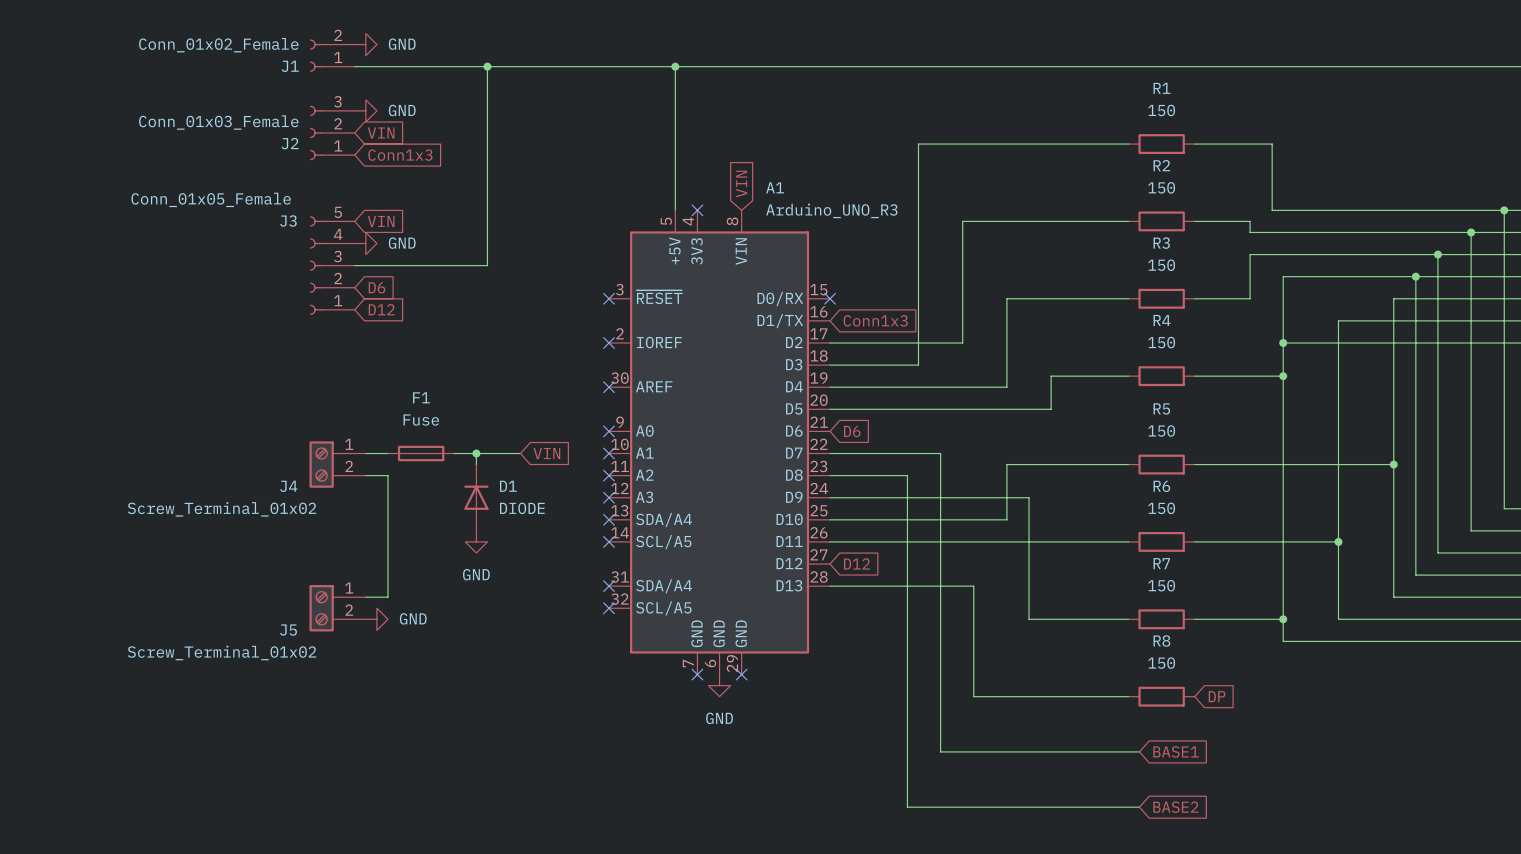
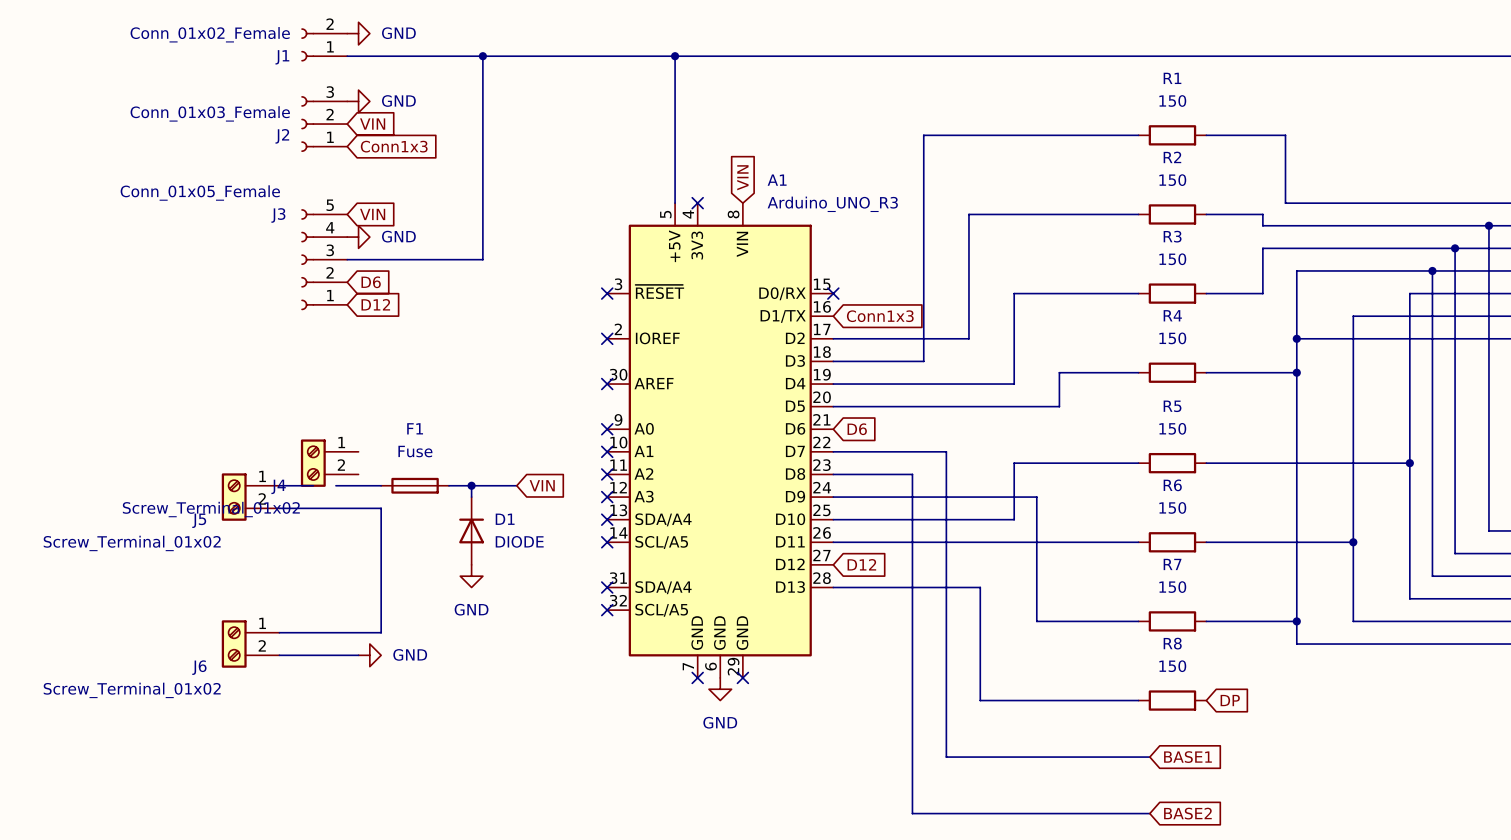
wire: (365, 453) (387, 453) -> none
F1 position: (421, 453) -> (415, 485)
wire: (454, 453) (520, 453) -> (448, 485) (516, 485)
junction position: (476, 453) -> (471, 485)
global label position: VIN (546, 453) -> VIN (542, 485)
wire: (365, 475) (387, 475) (387, 508) -> (279, 508) (381, 508)
wire: none -> (279, 485) (313, 485)
wire: none -> (335, 485) (381, 485)
D1 position: (476, 497) -> (471, 530)
power symbol position: GND (476, 541) -> GND (471, 576)
wire: (365, 597) (387, 597) -> (279, 632) (381, 632) (381, 598)
J5 position: (337, 608) -> (250, 497)
power symbol position: GND (376, 619) -> GND (369, 655)
J6: none -> Screw_Terminal_01x02 (250, 644)
wire: none -> (279, 655) (358, 655)

